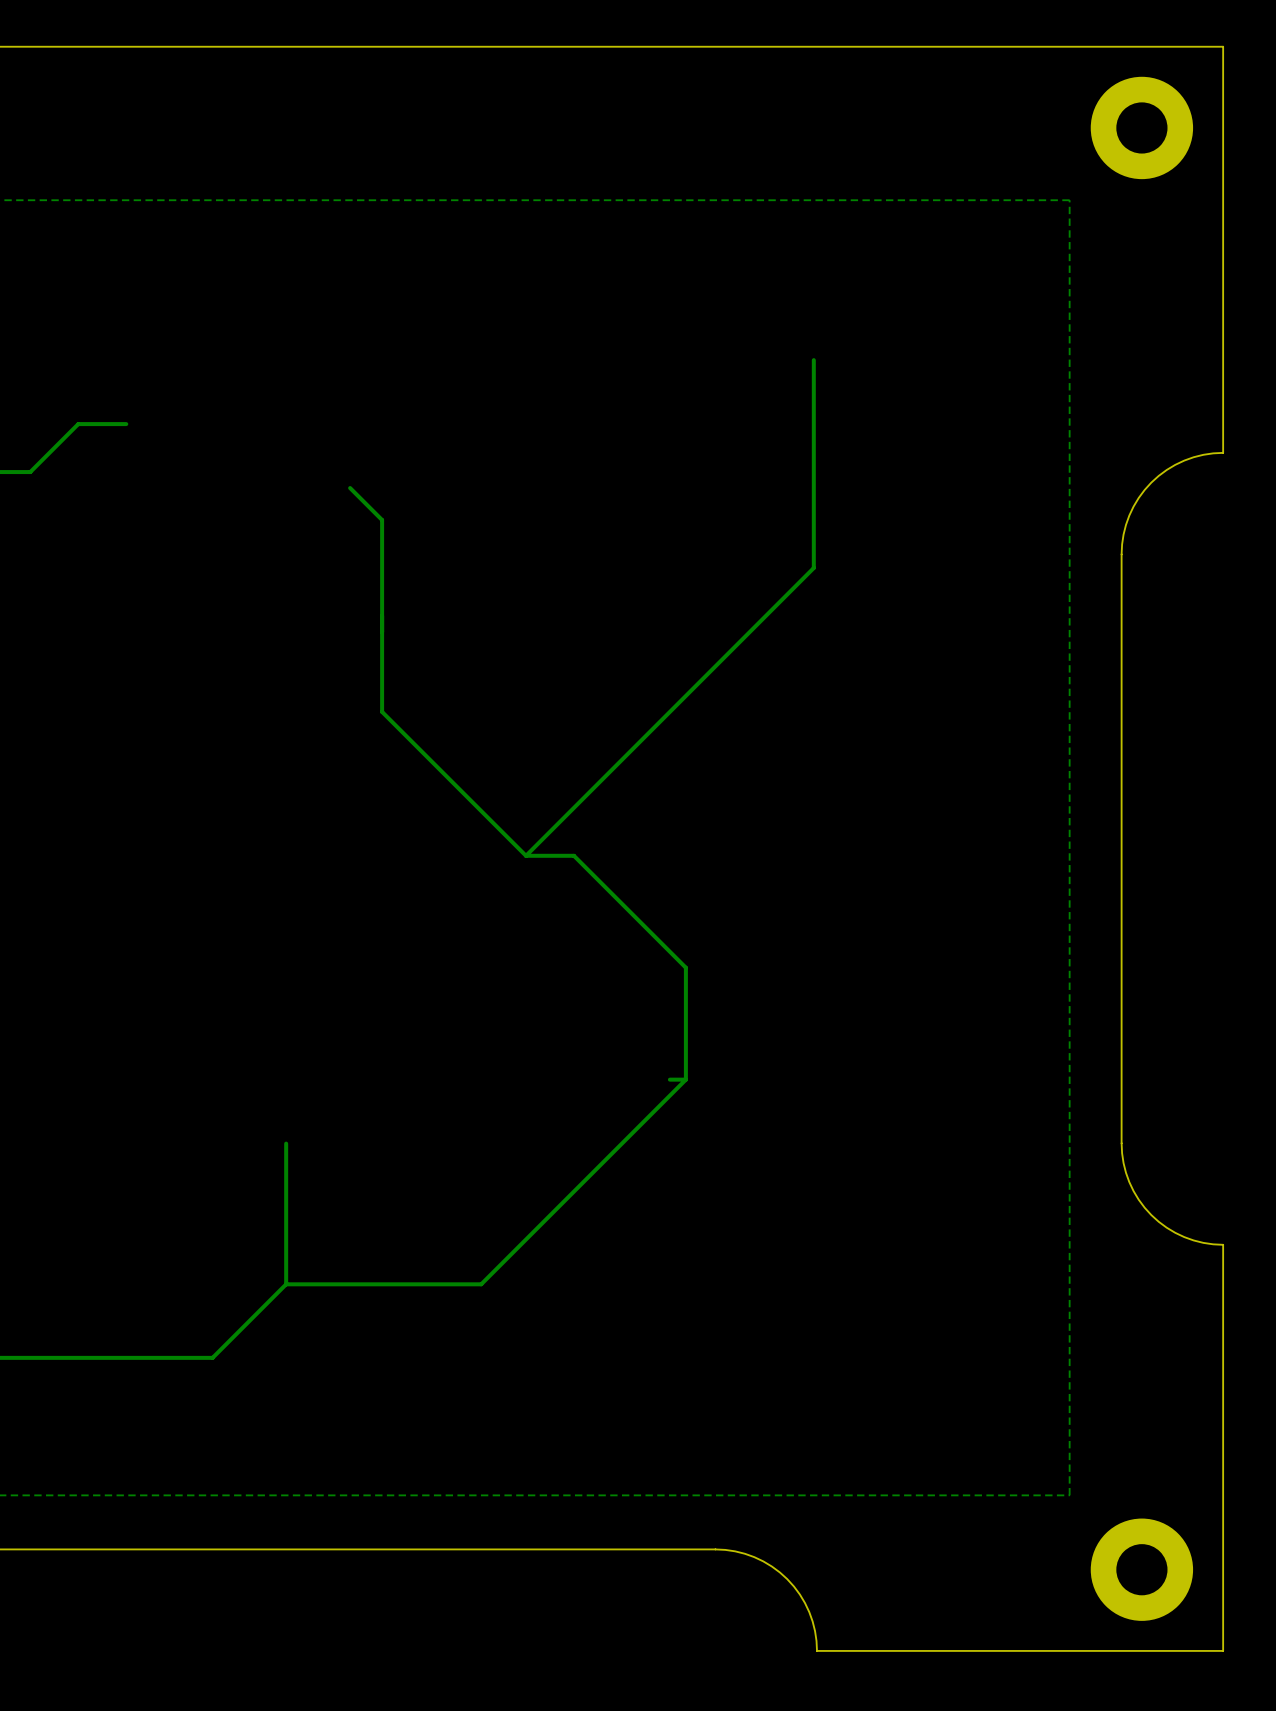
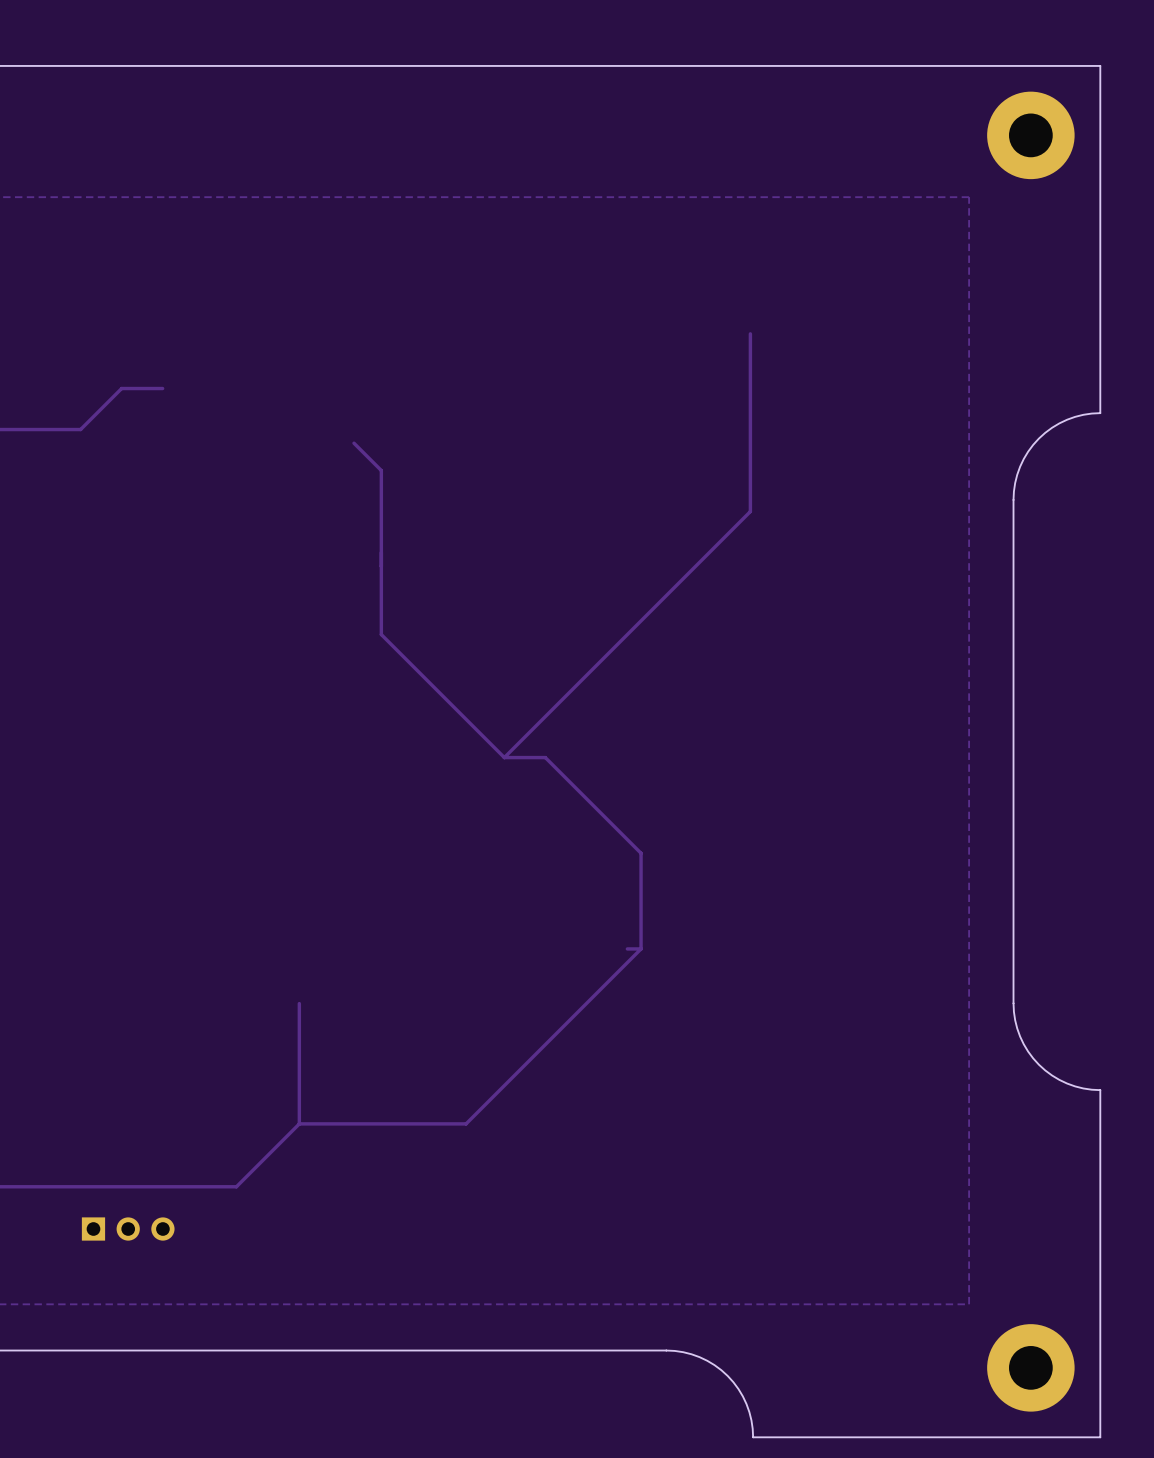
part: none -> (128, 1229)

